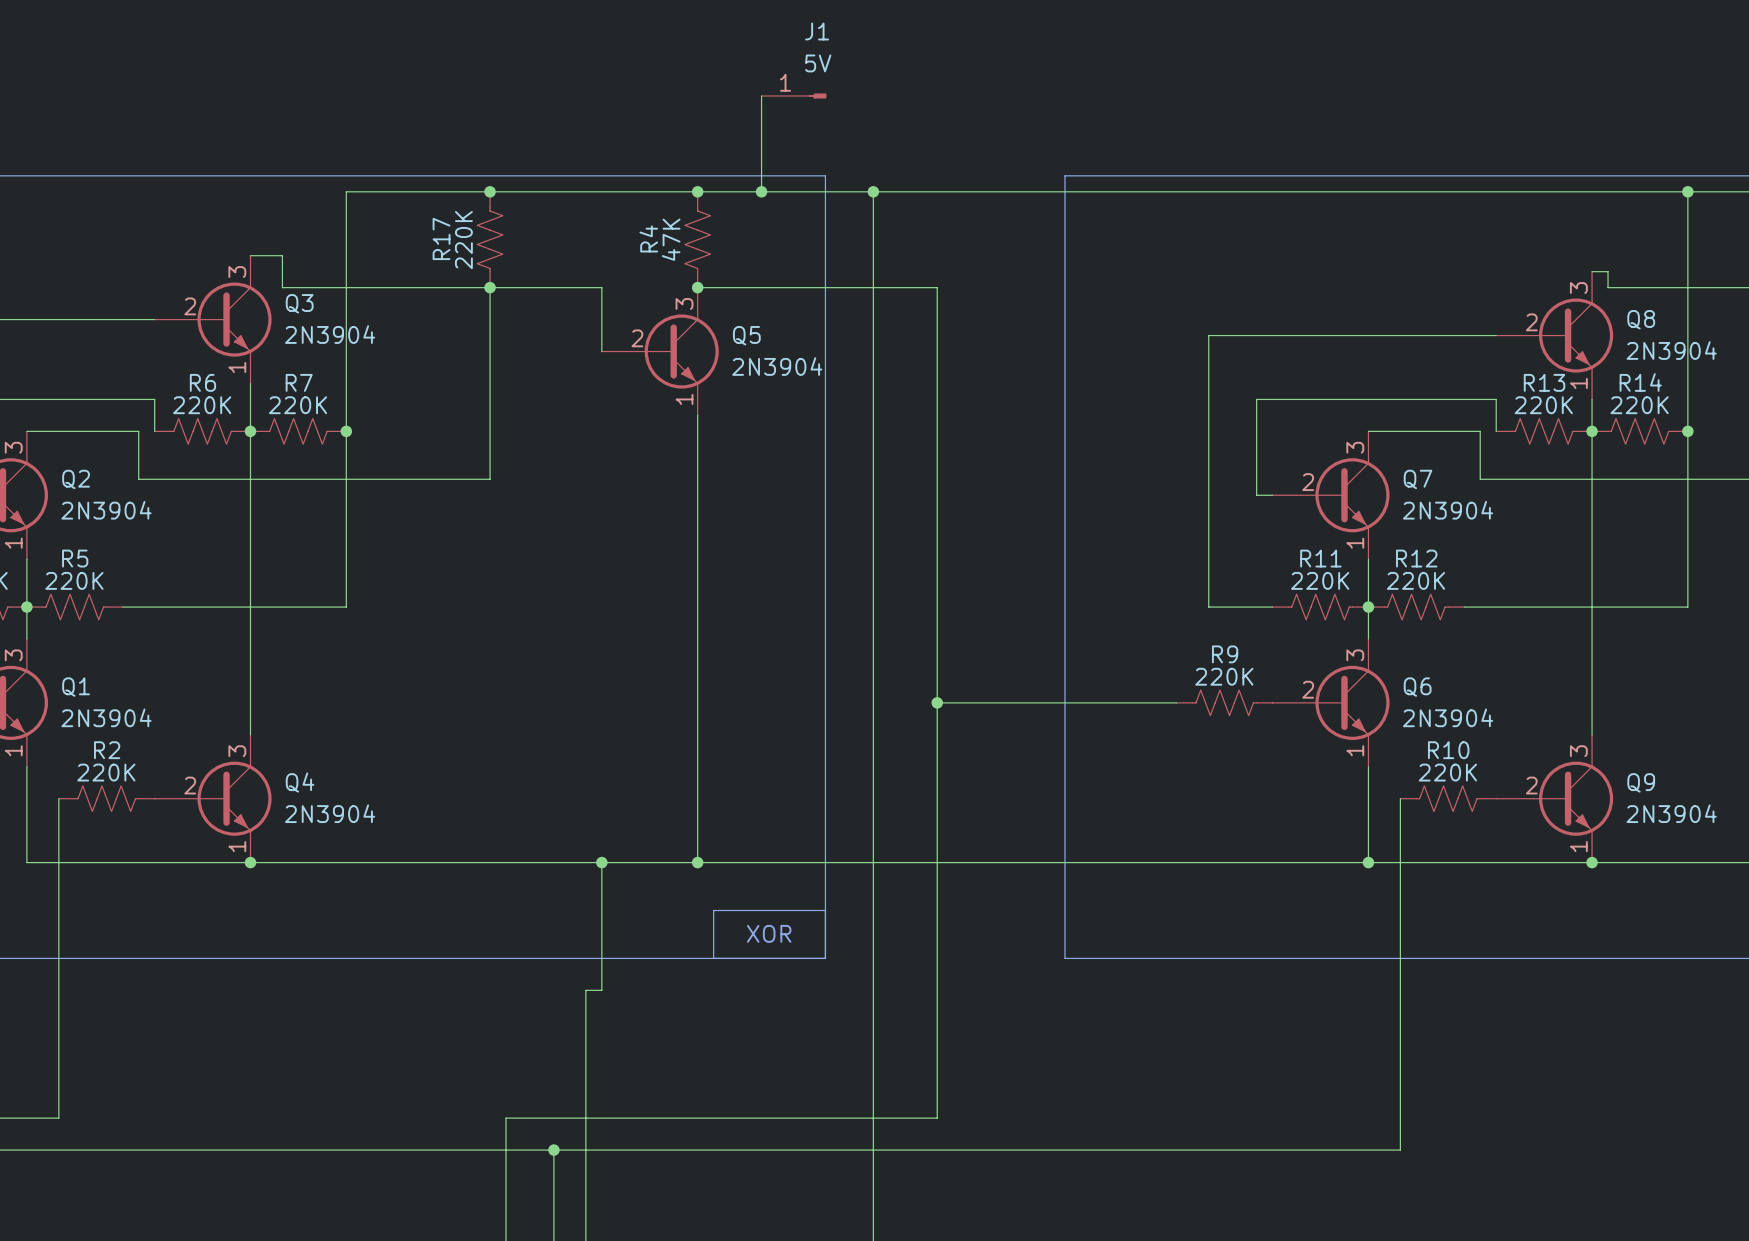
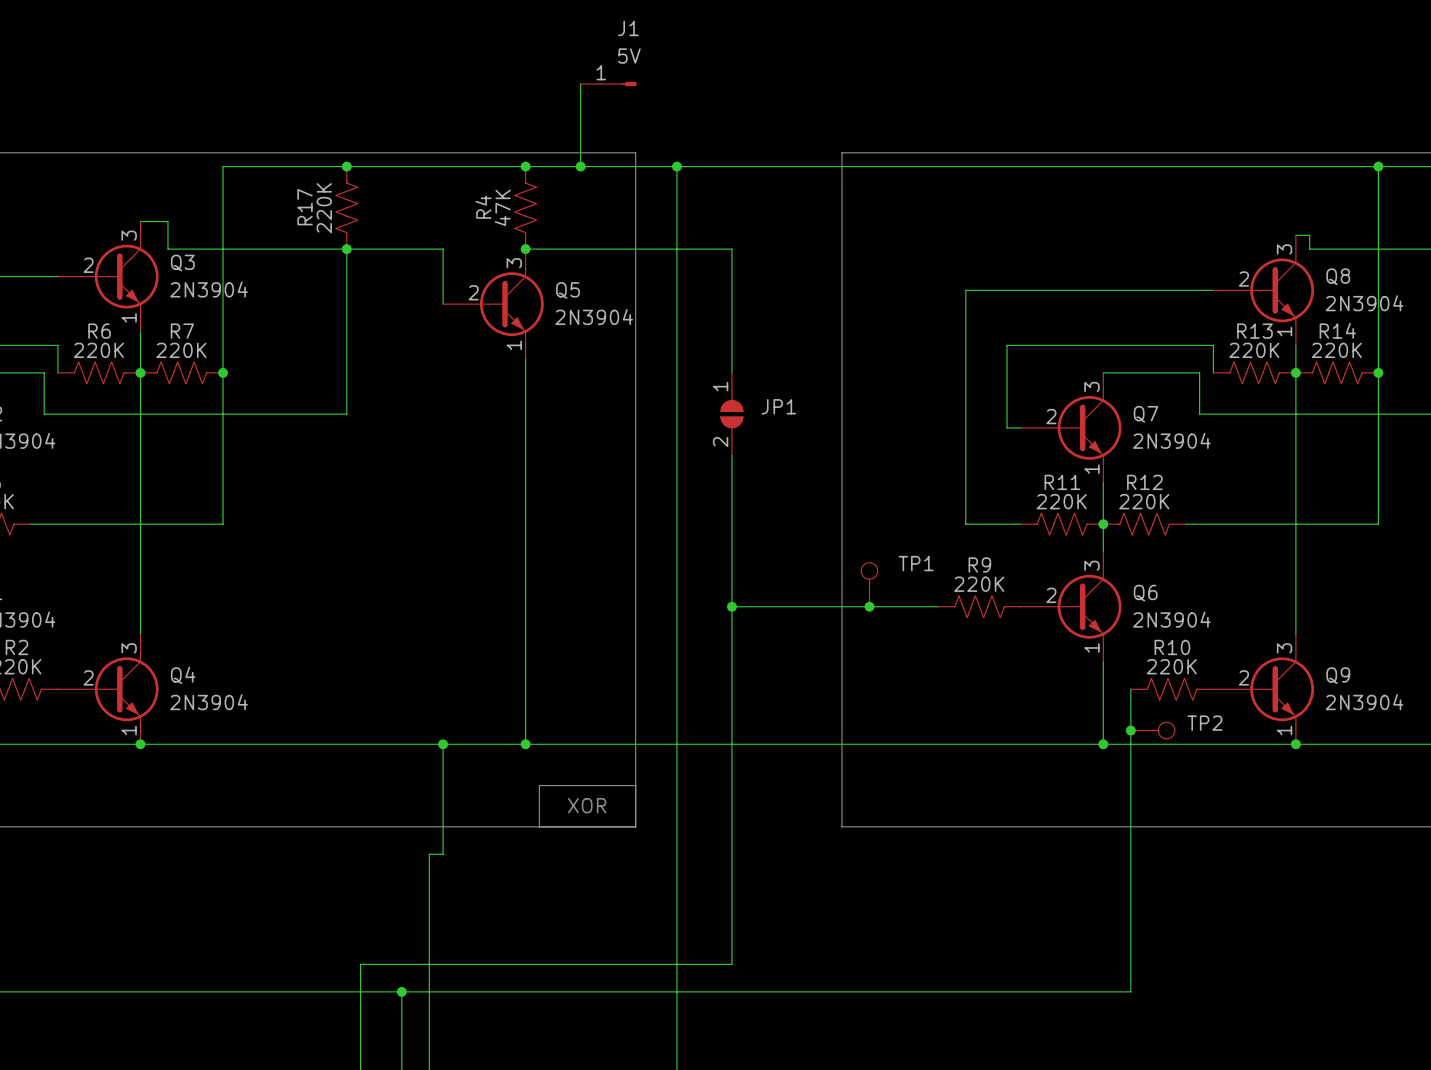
JP1: none -> (731, 414)
TP1: none -> (869, 584)
junction: none -> (869, 606)
junction: none -> (1130, 730)
TP2: none -> (1152, 730)

